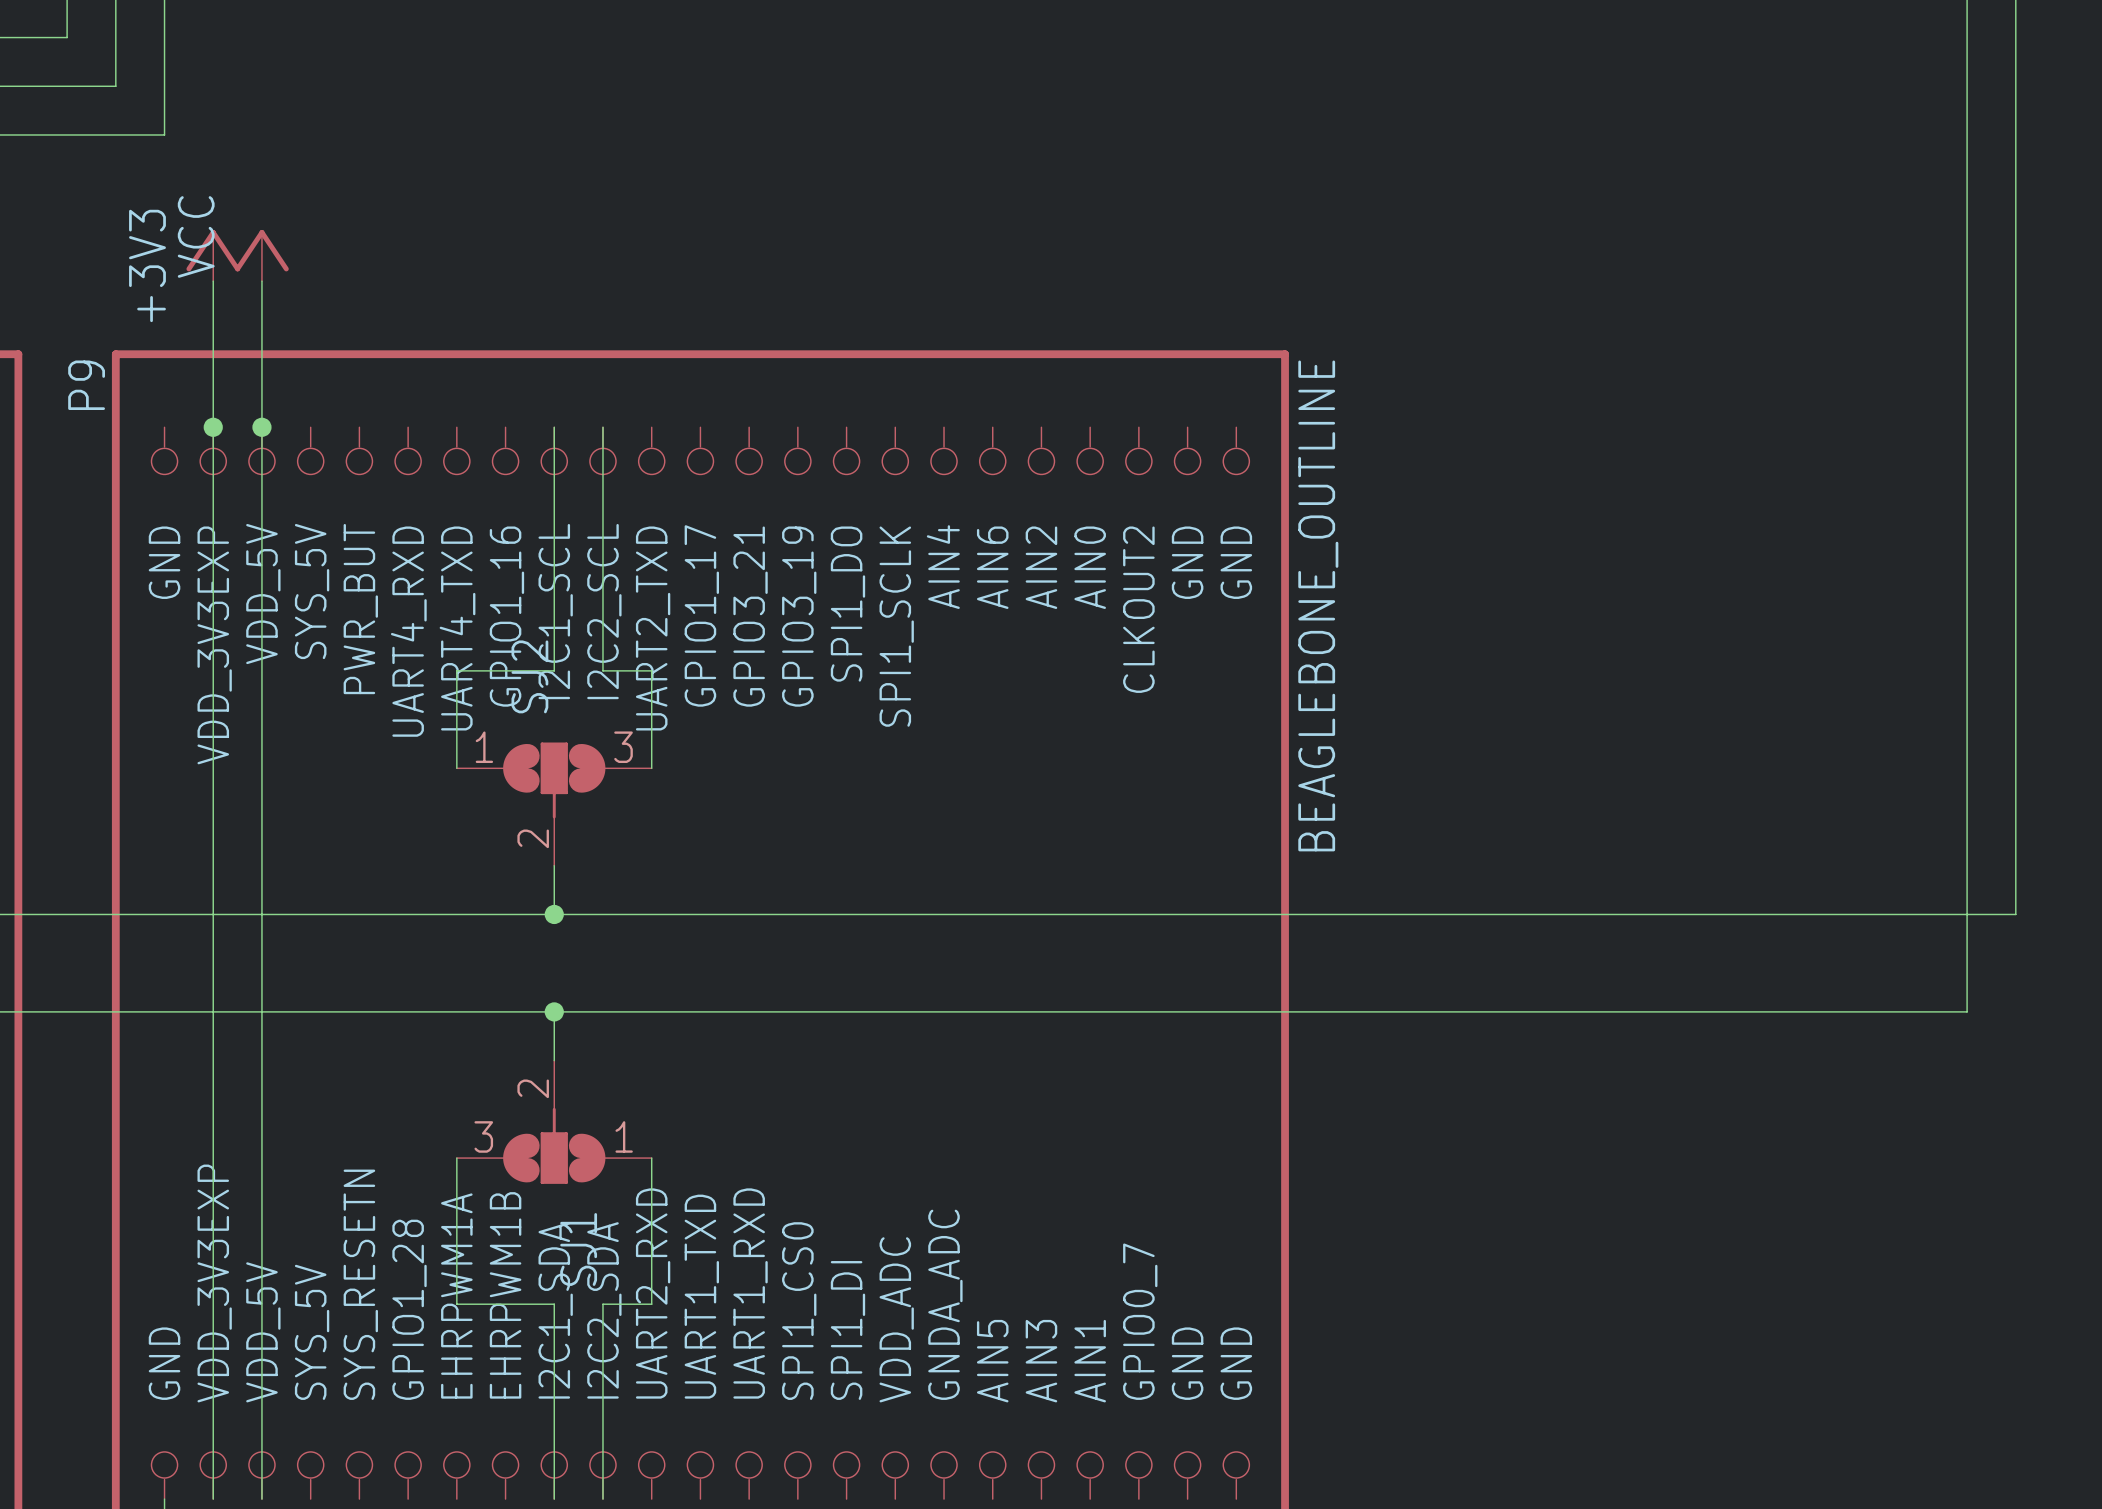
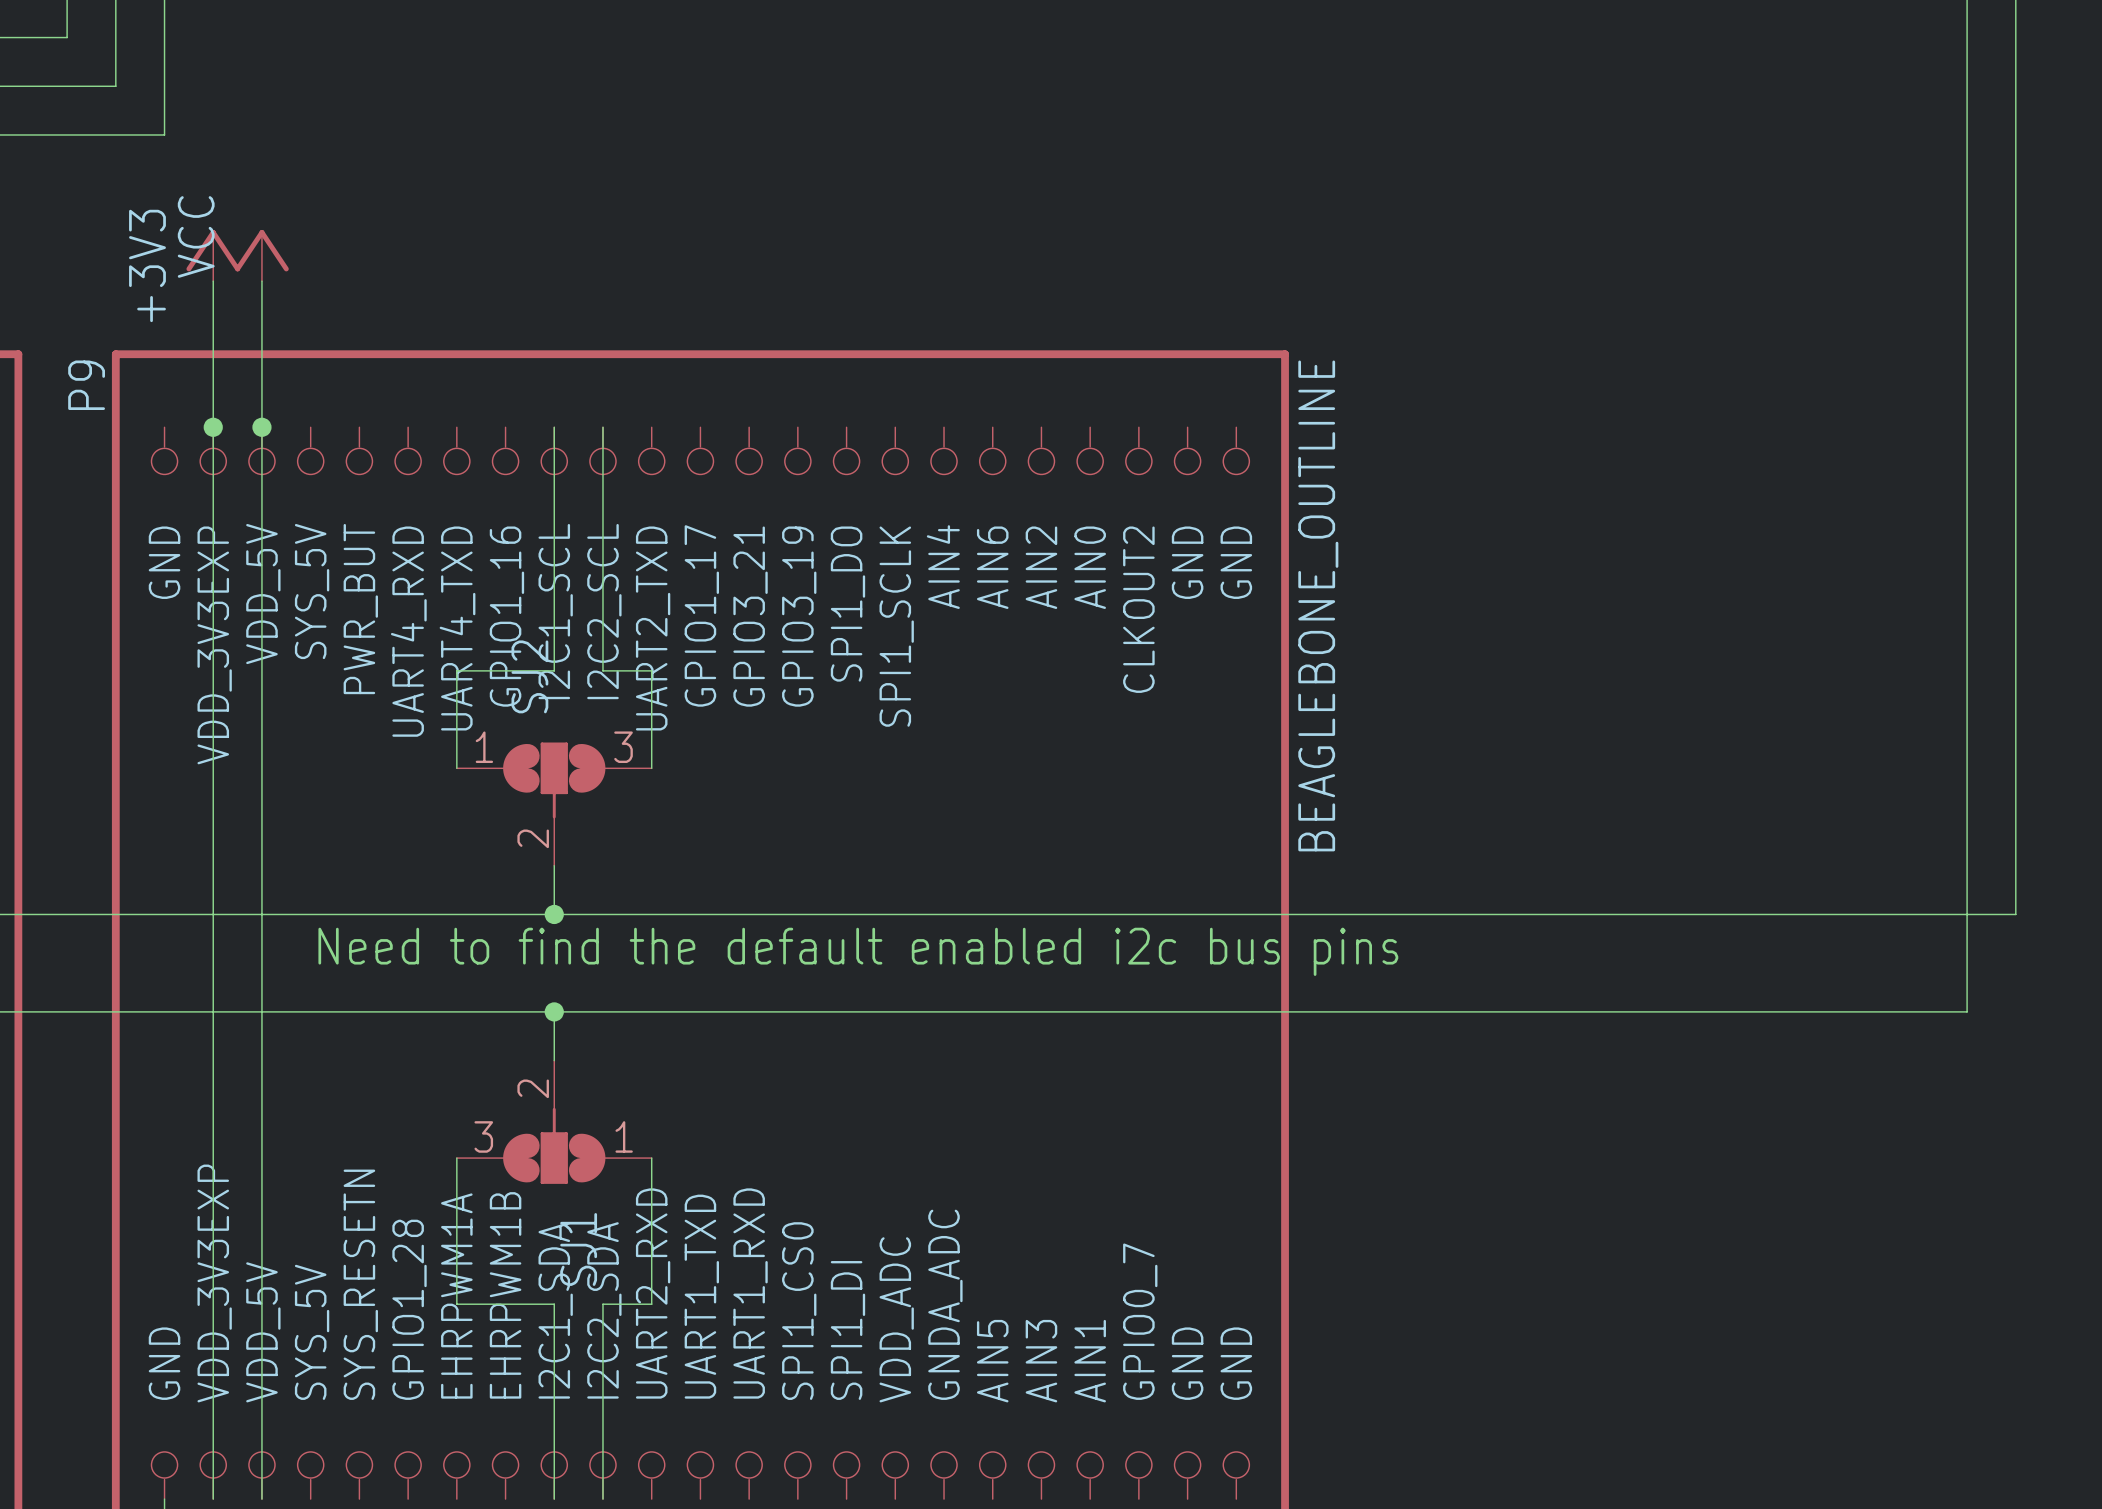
text: none -> Need to find the default enabled i2c bus pins (858, 951)

